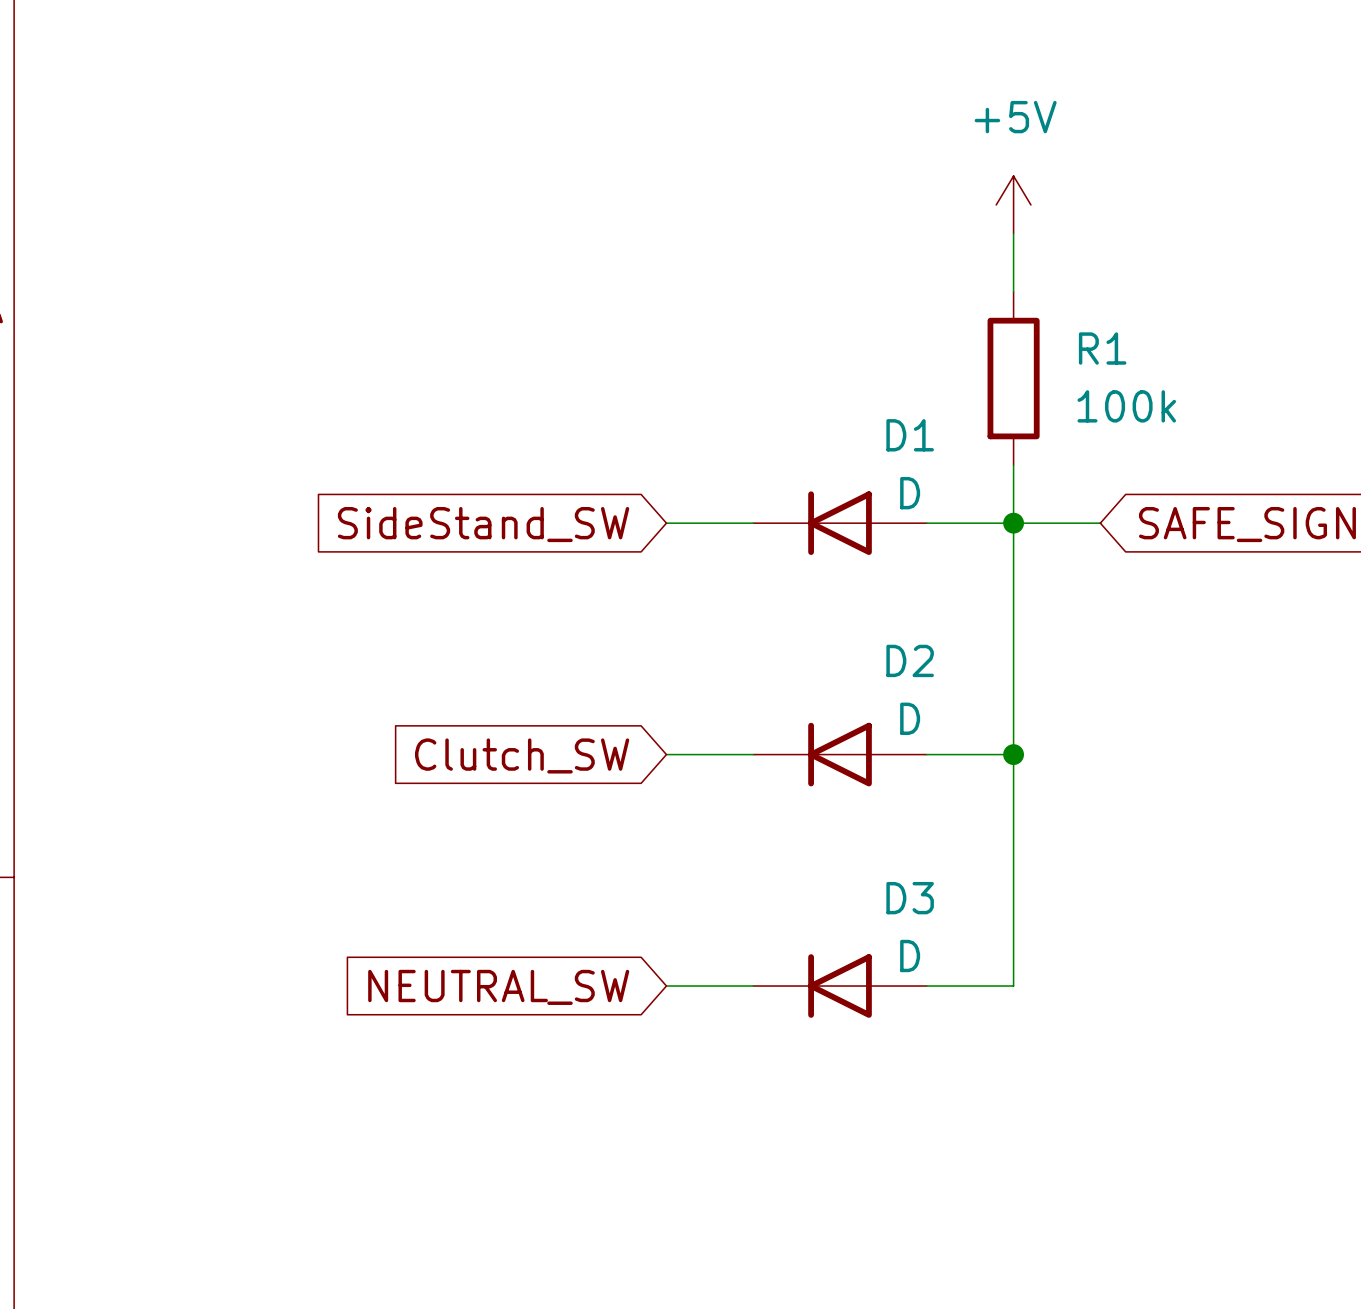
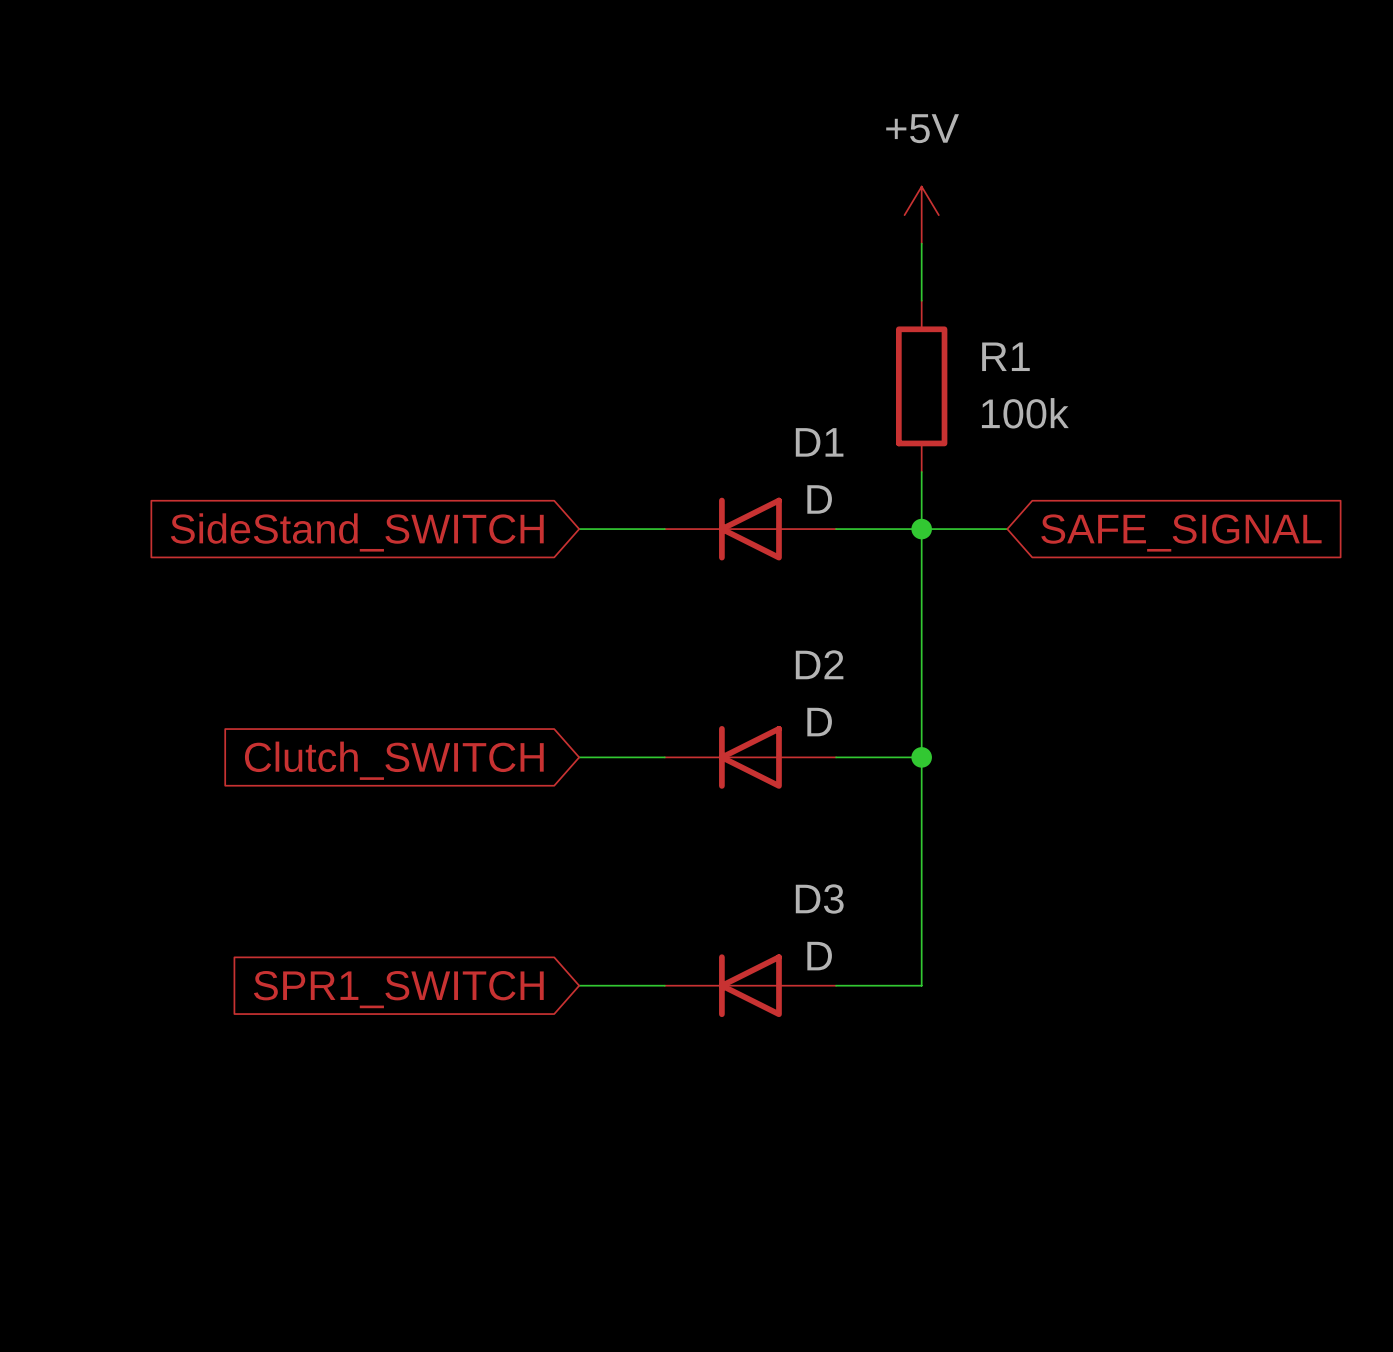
global label: SideStand_SW (483, 524) -> SideStand_SWITCH (357, 532)
global label: Clutch_SW (522, 755) -> Clutch_SWITCH (394, 760)
global label: NEUTRAL_SW (498, 987) -> SPR1_SWITCH (398, 989)

